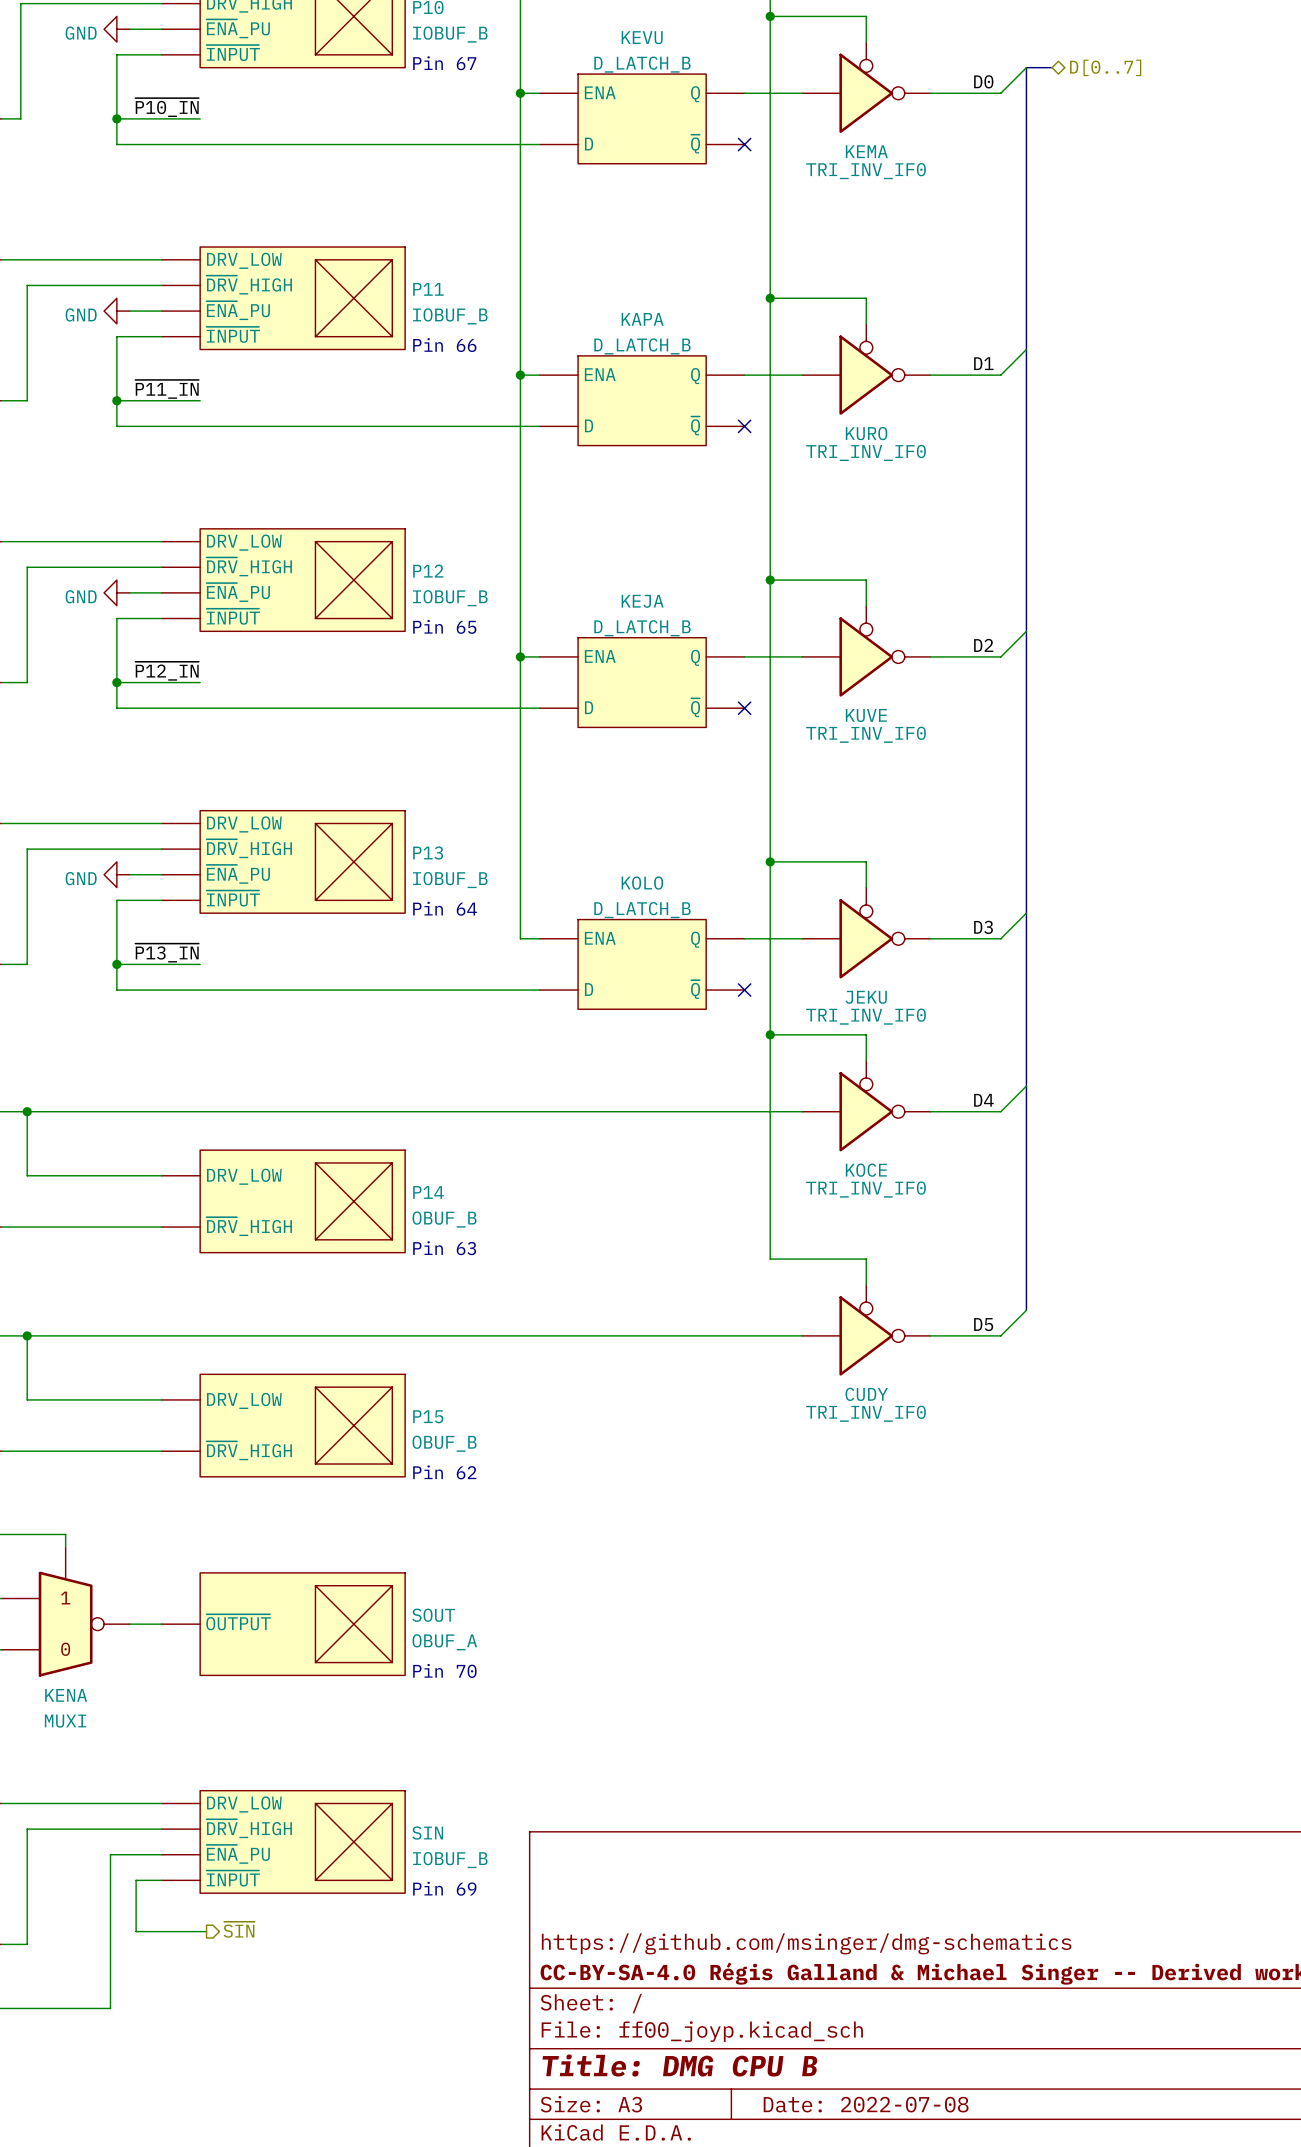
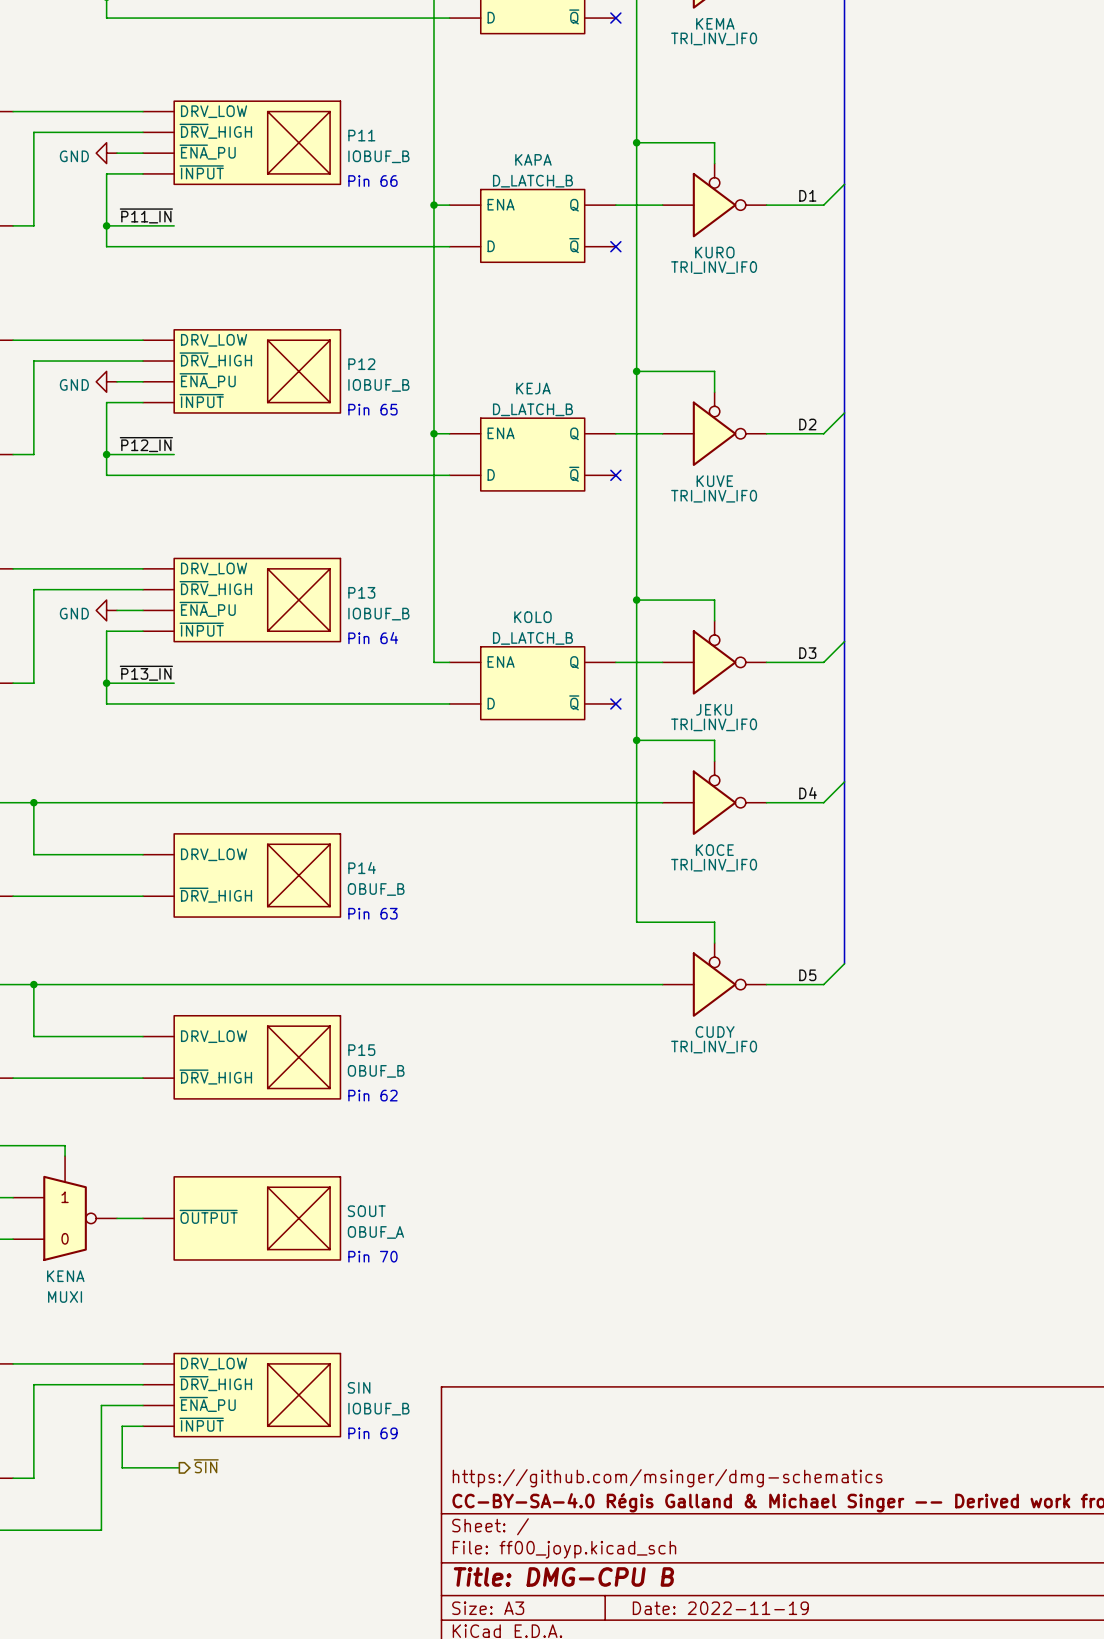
title block: Title: DMG CPU B (679, 2065) -> Title: DMG-CPU B (563, 1576)
title block: Date: 2022-07-08 (866, 2104) -> Date: 2022-11-19 (720, 1608)

